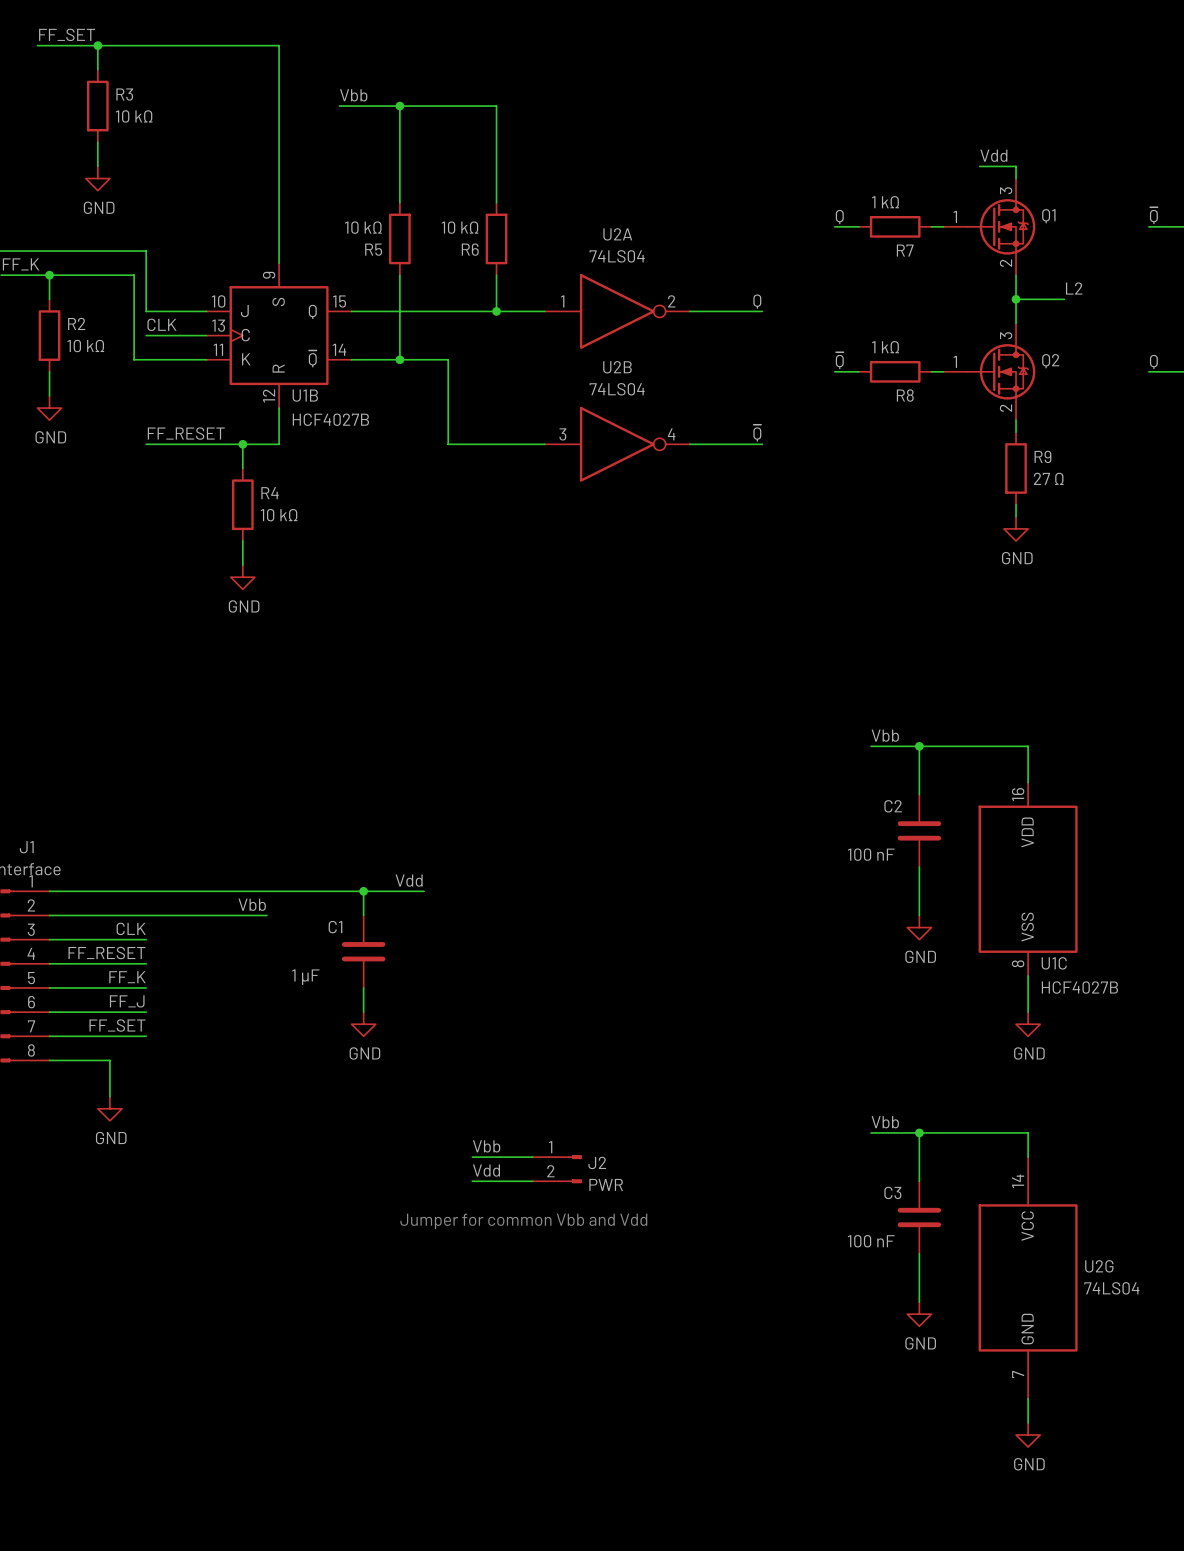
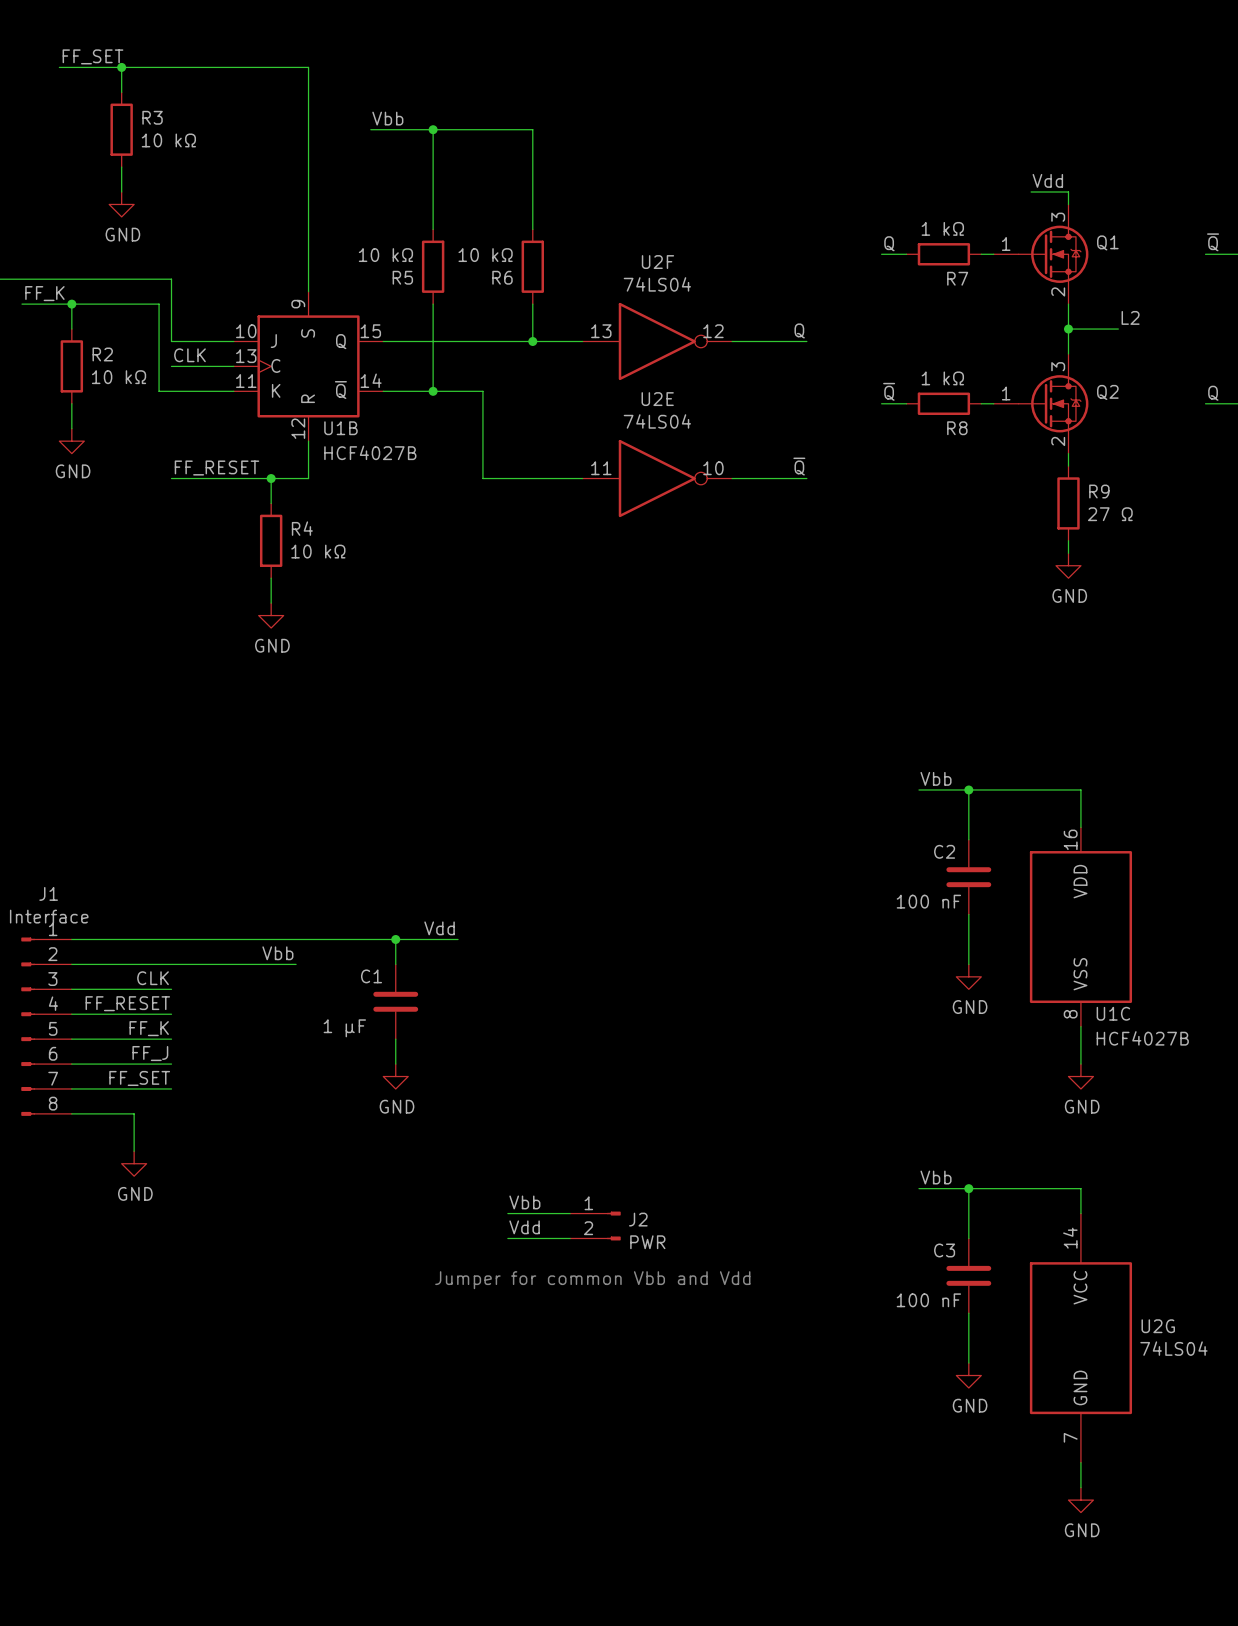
U2A name: U2A (617, 234) -> U2F (657, 262)
U2A pin number: 1 (562, 301) -> 13 (601, 331)
U2A pin number: 2 (671, 301) -> 12 (713, 331)
U2B name: U2B (617, 367) -> U2E (657, 399)
U2B pin number: 3 (562, 434) -> 11 (601, 468)
U2B pin number: 4 (671, 434) -> 10 (713, 468)

